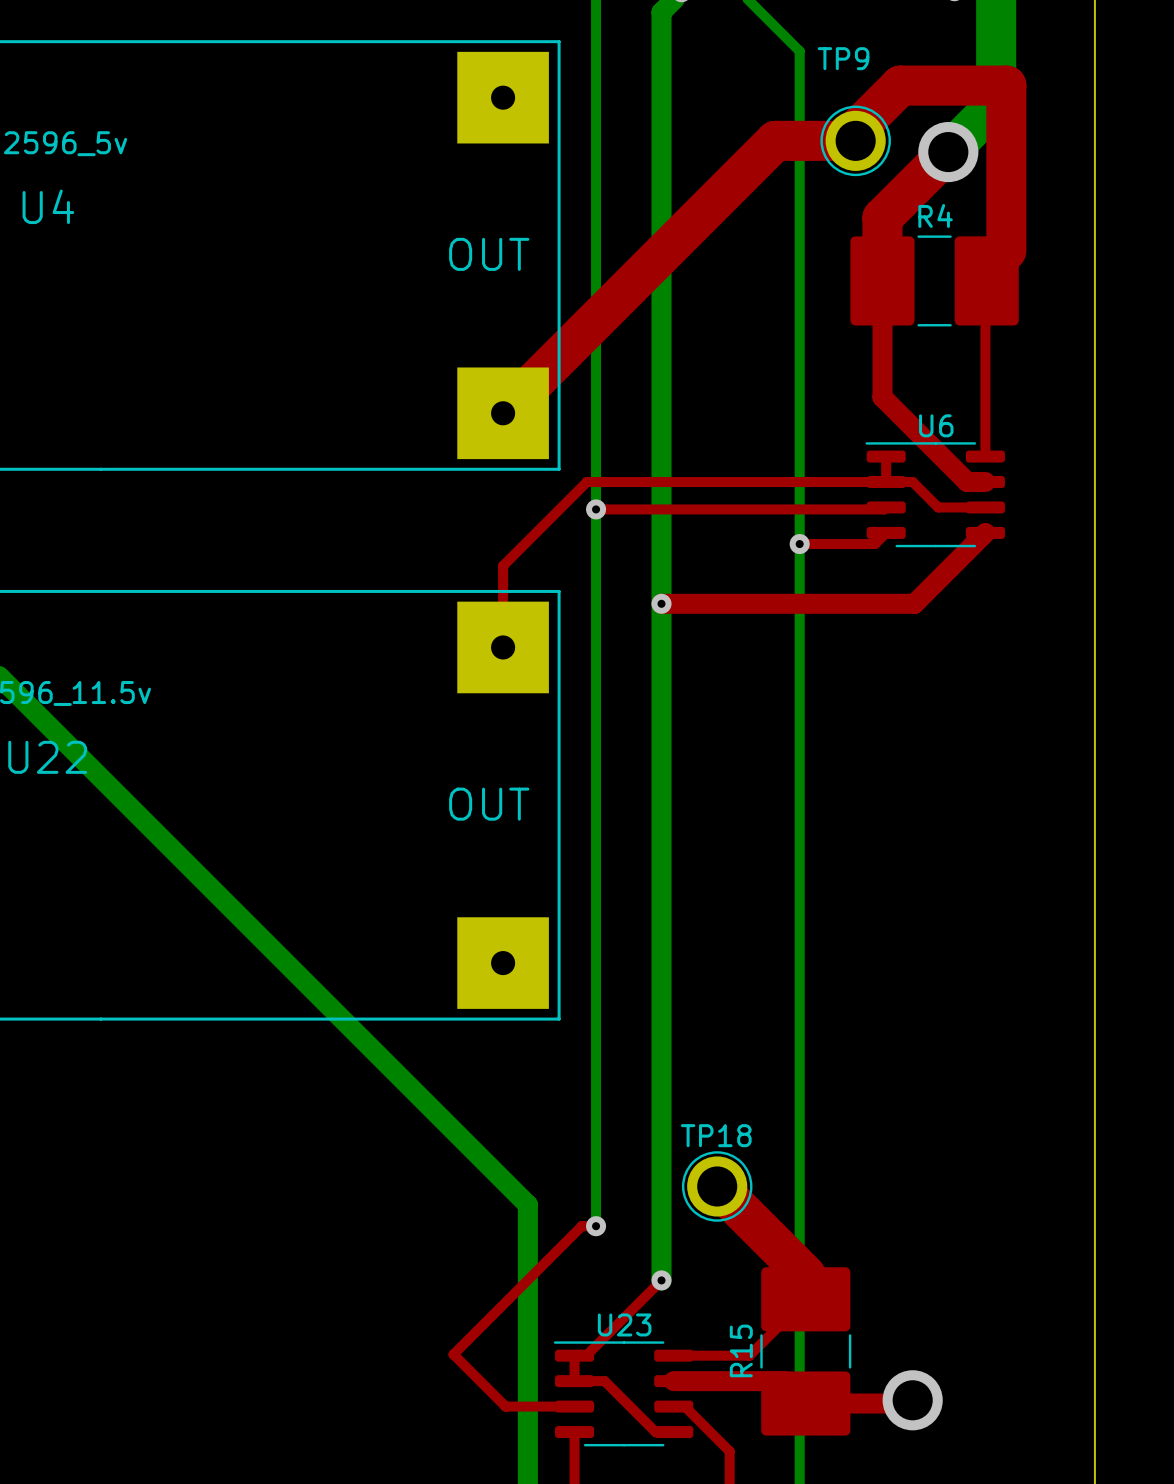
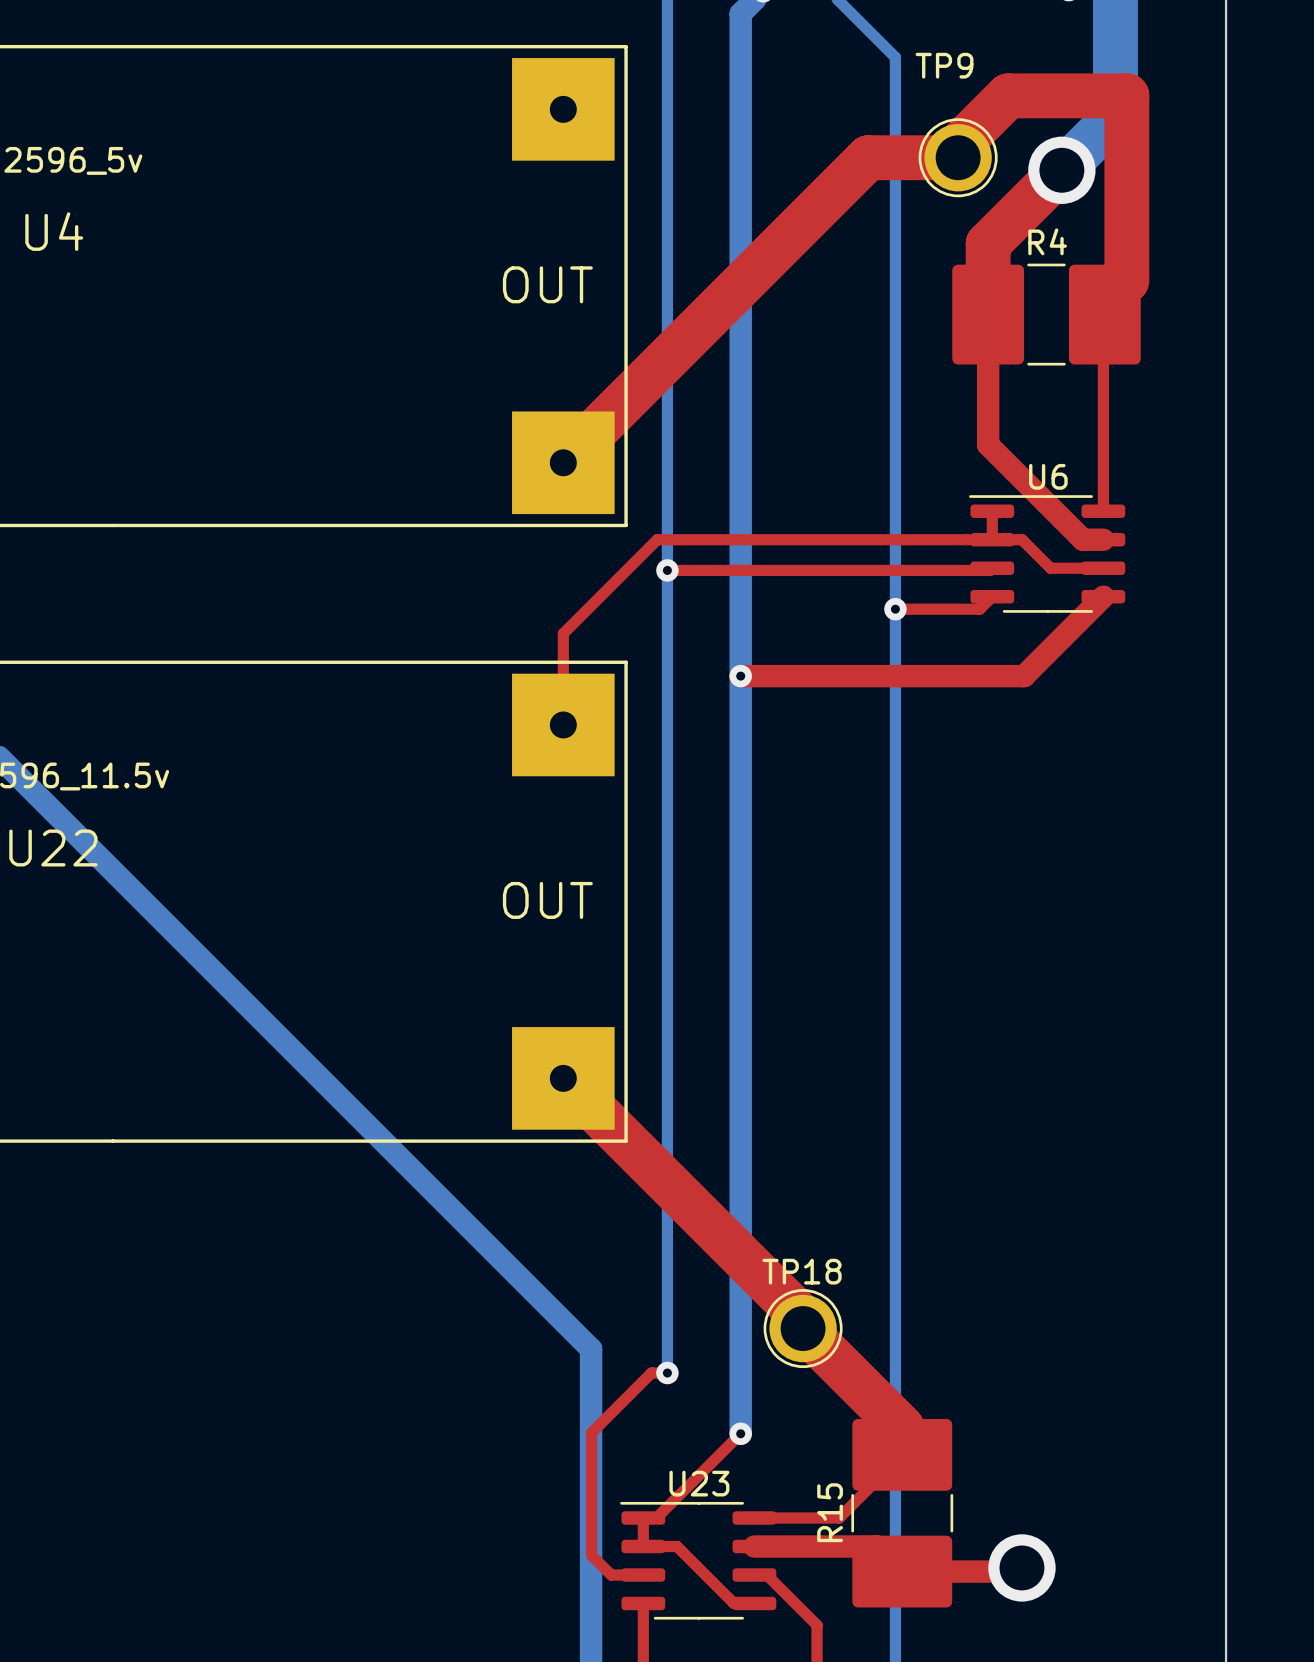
top track: none -> (563, 1078) (803, 1318) (803, 1328)
top track: (528, 1279) (453, 1354) (505, 1406) (545, 1406) -> (591, 1432) (591, 1555) (611, 1575)

